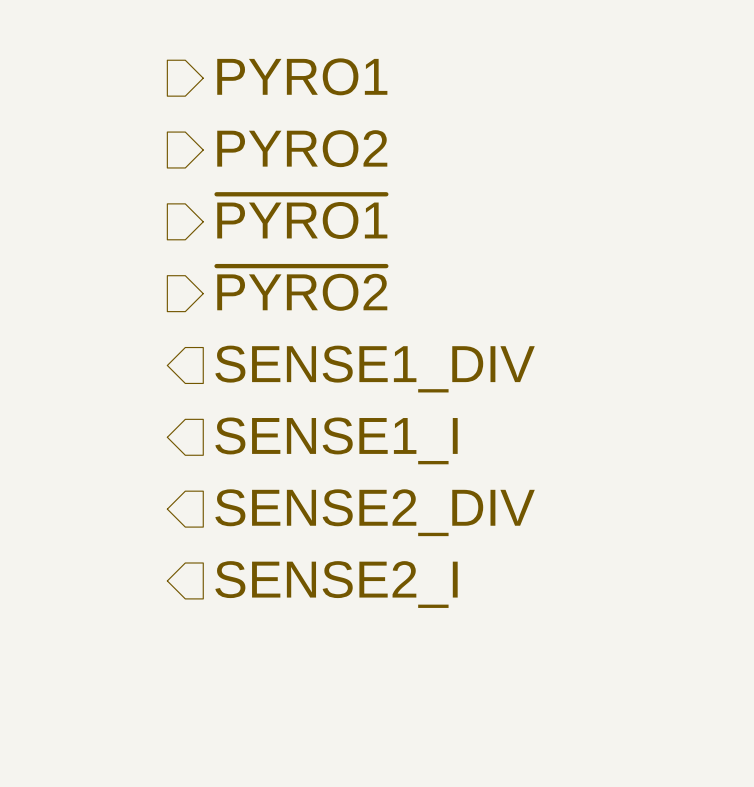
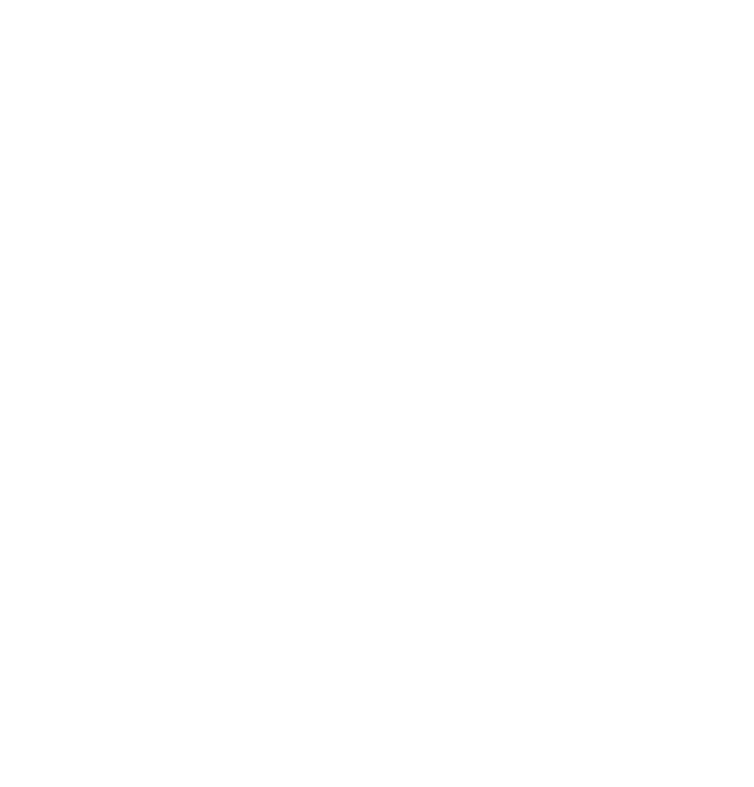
hierarchical label: PYRO1 (302, 76) -> none
hierarchical label: PYRO2 (302, 148) -> none
hierarchical label: ~{PYRO1} (301, 216) -> none
hierarchical label: ~{PYRO2} (301, 288) -> none
hierarchical label: SENSE1_DIV (375, 369) -> none
hierarchical label: SENSE1_I (336, 440) -> none
hierarchical label: SENSE2_DIV (375, 512) -> none
hierarchical label: SENSE2_I (336, 584) -> none

